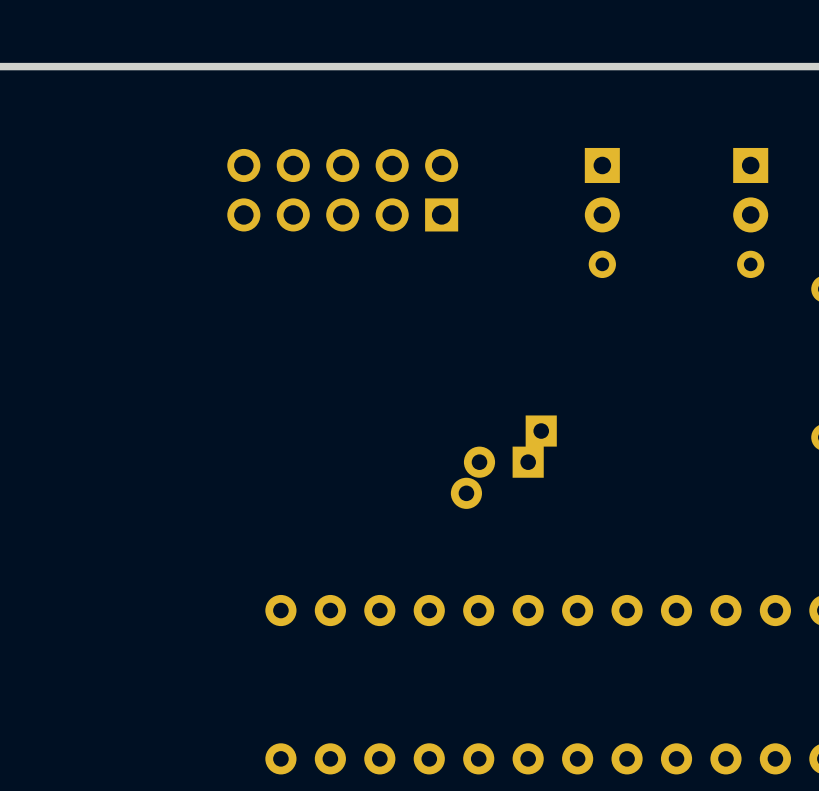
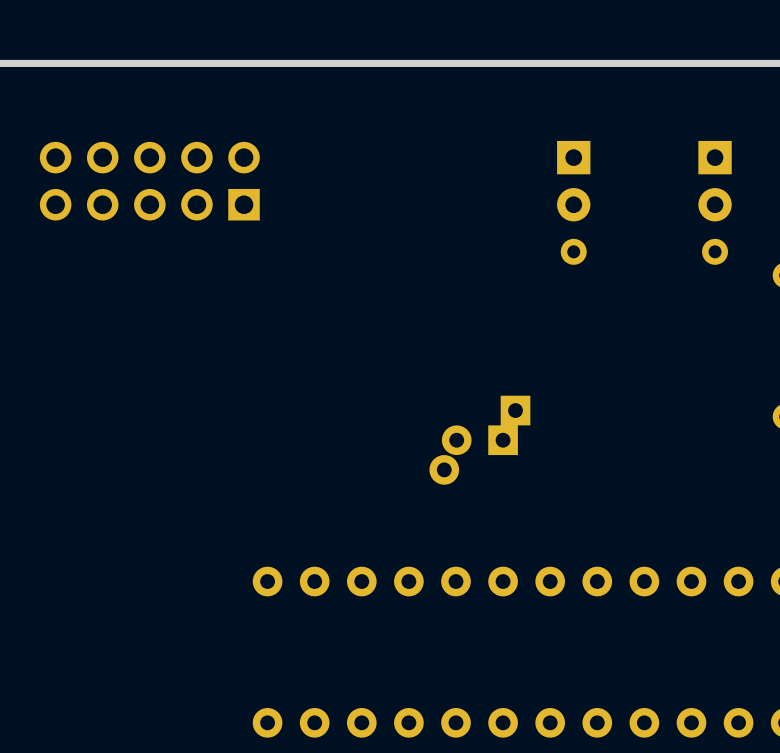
part position: (342, 190) -> (149, 181)

